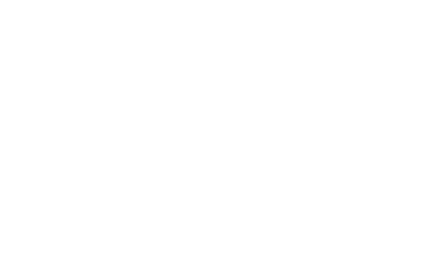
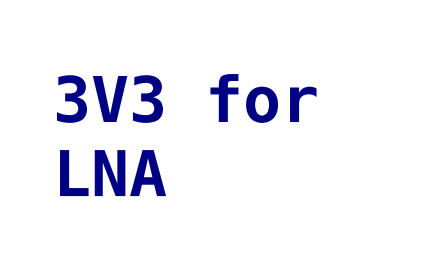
text: none -> 3V3 for (186, 98)
text: none -> LNA (113, 173)

